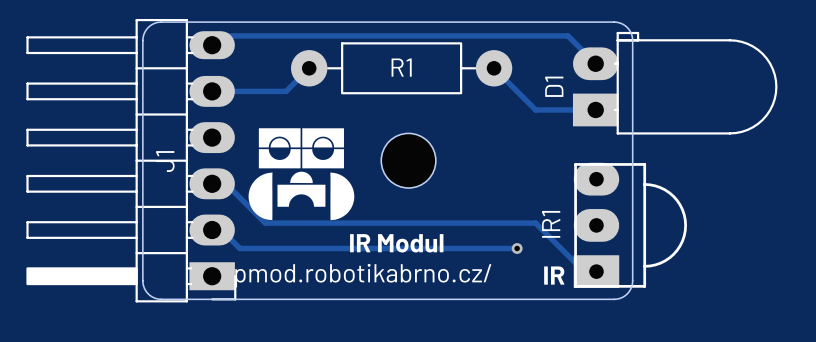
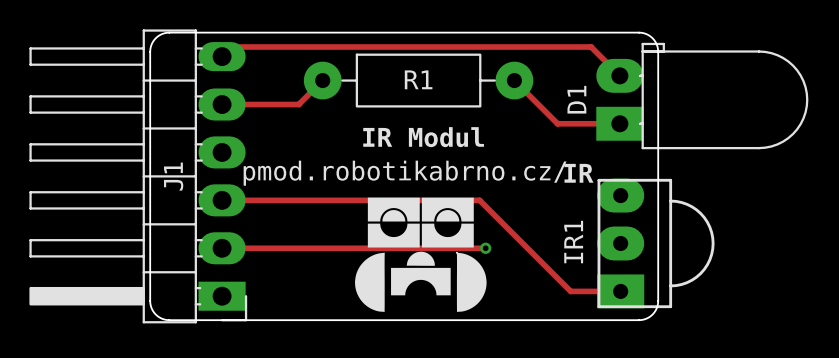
drawing: [248, 128, 355, 221] -> none
part: (408, 160) -> none
drawing: none -> [355, 197, 487, 312]
track: (226, 183) (265, 223) (535, 223) (584, 271) -> (236, 200) (479, 200) (570, 291) (607, 291)
track: (221, 230) (239, 248) (517, 248) -> (231, 248) (485, 248)
text position: IR Modul (396, 243) -> IR Modul (423, 137)
via position: (517, 248) -> (485, 248)
text position: pmod.robotikabrno.cz/ (363, 275) -> pmod.robotikabrno.cz/ (405, 173)
text position: IR (554, 275) -> IR (579, 173)

